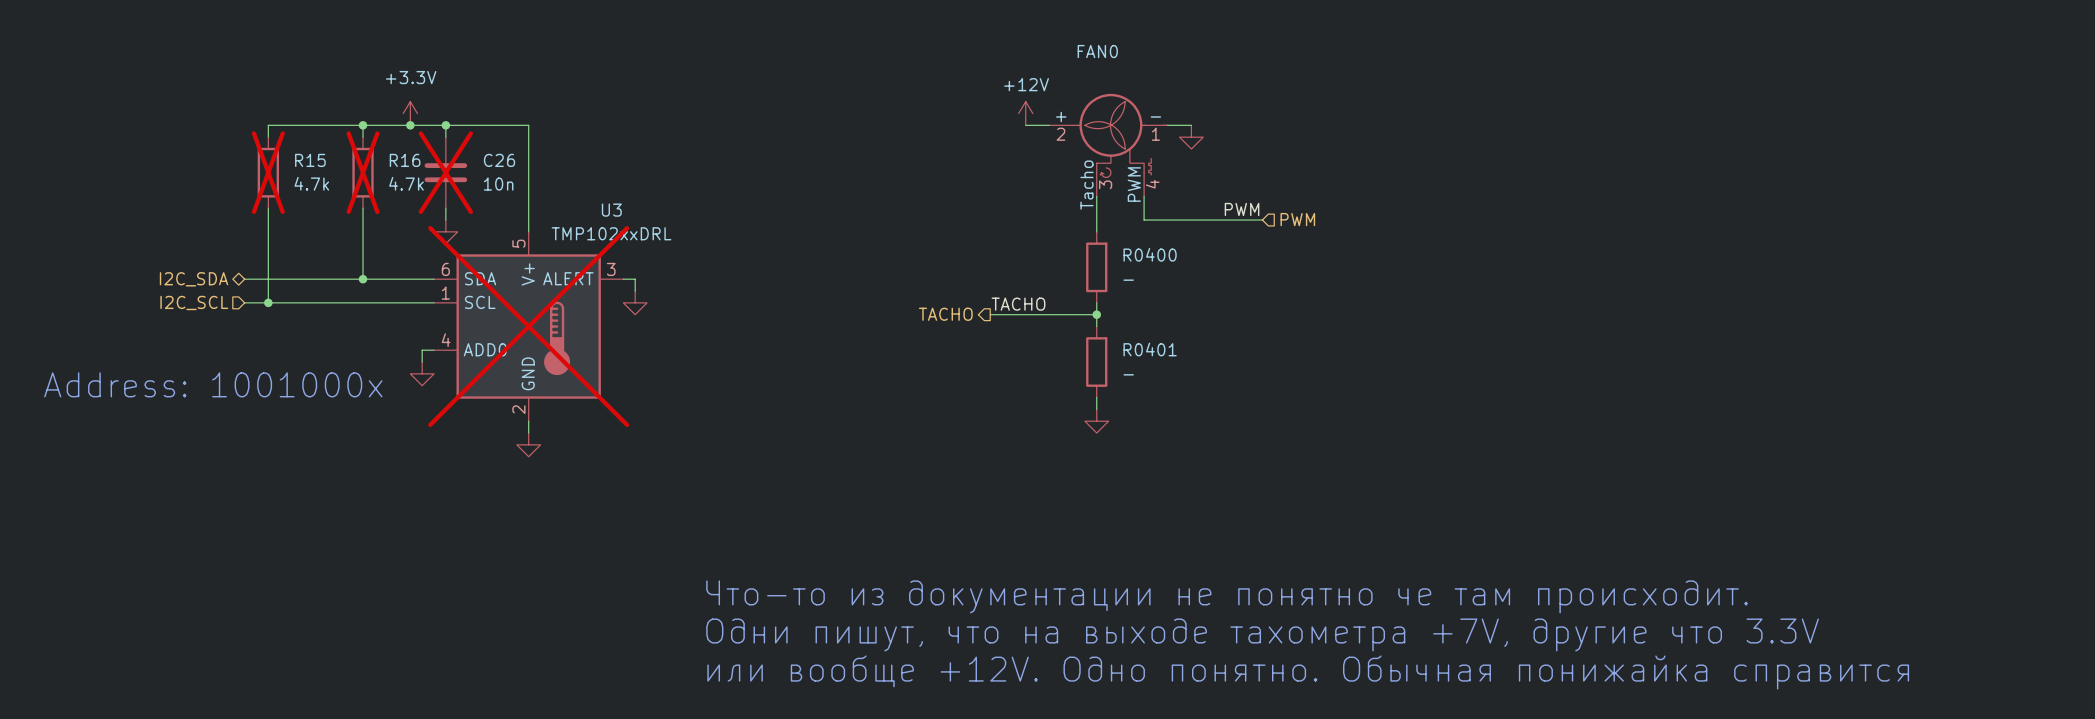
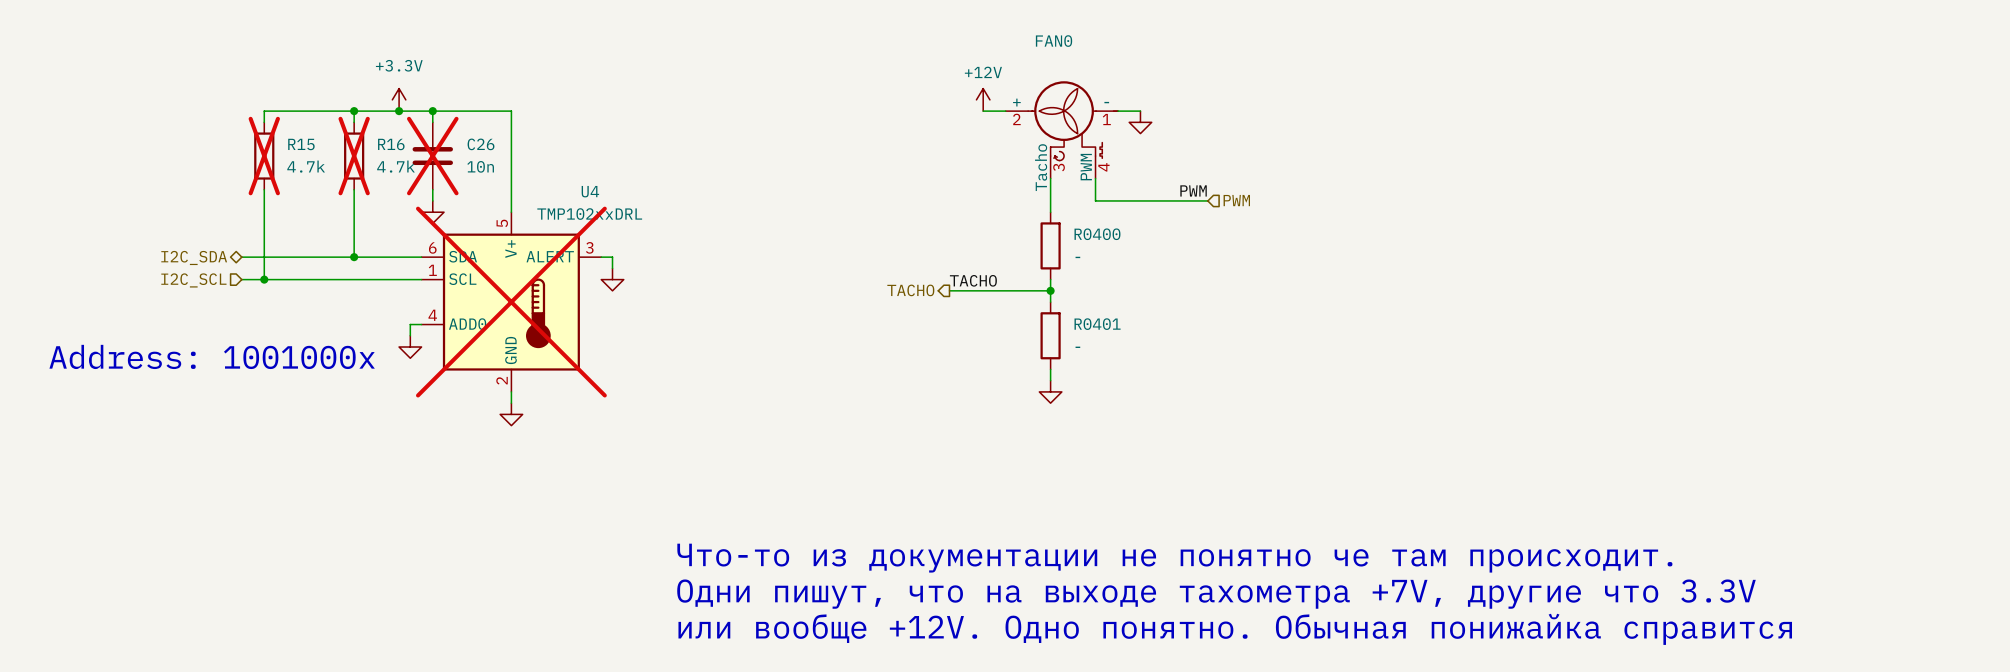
U3 name: U3 (611, 210) -> U4 (590, 191)

